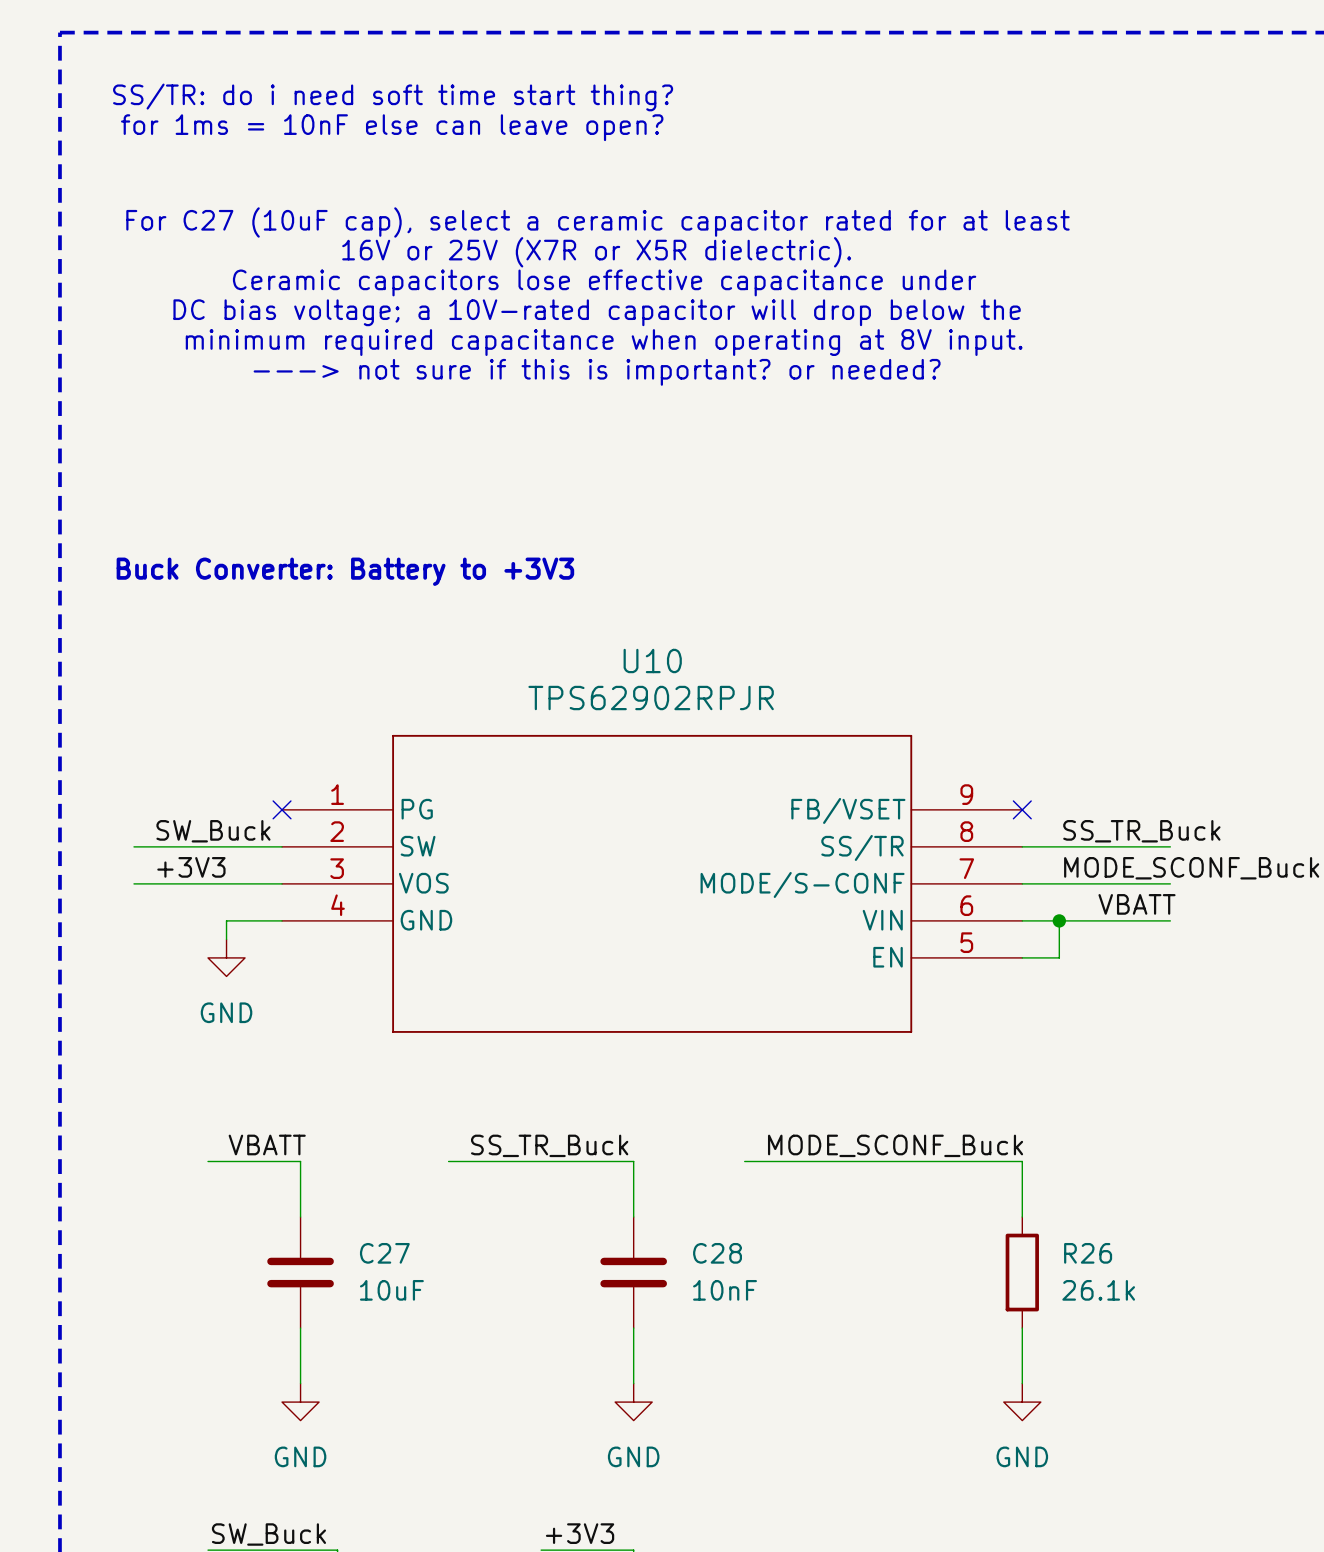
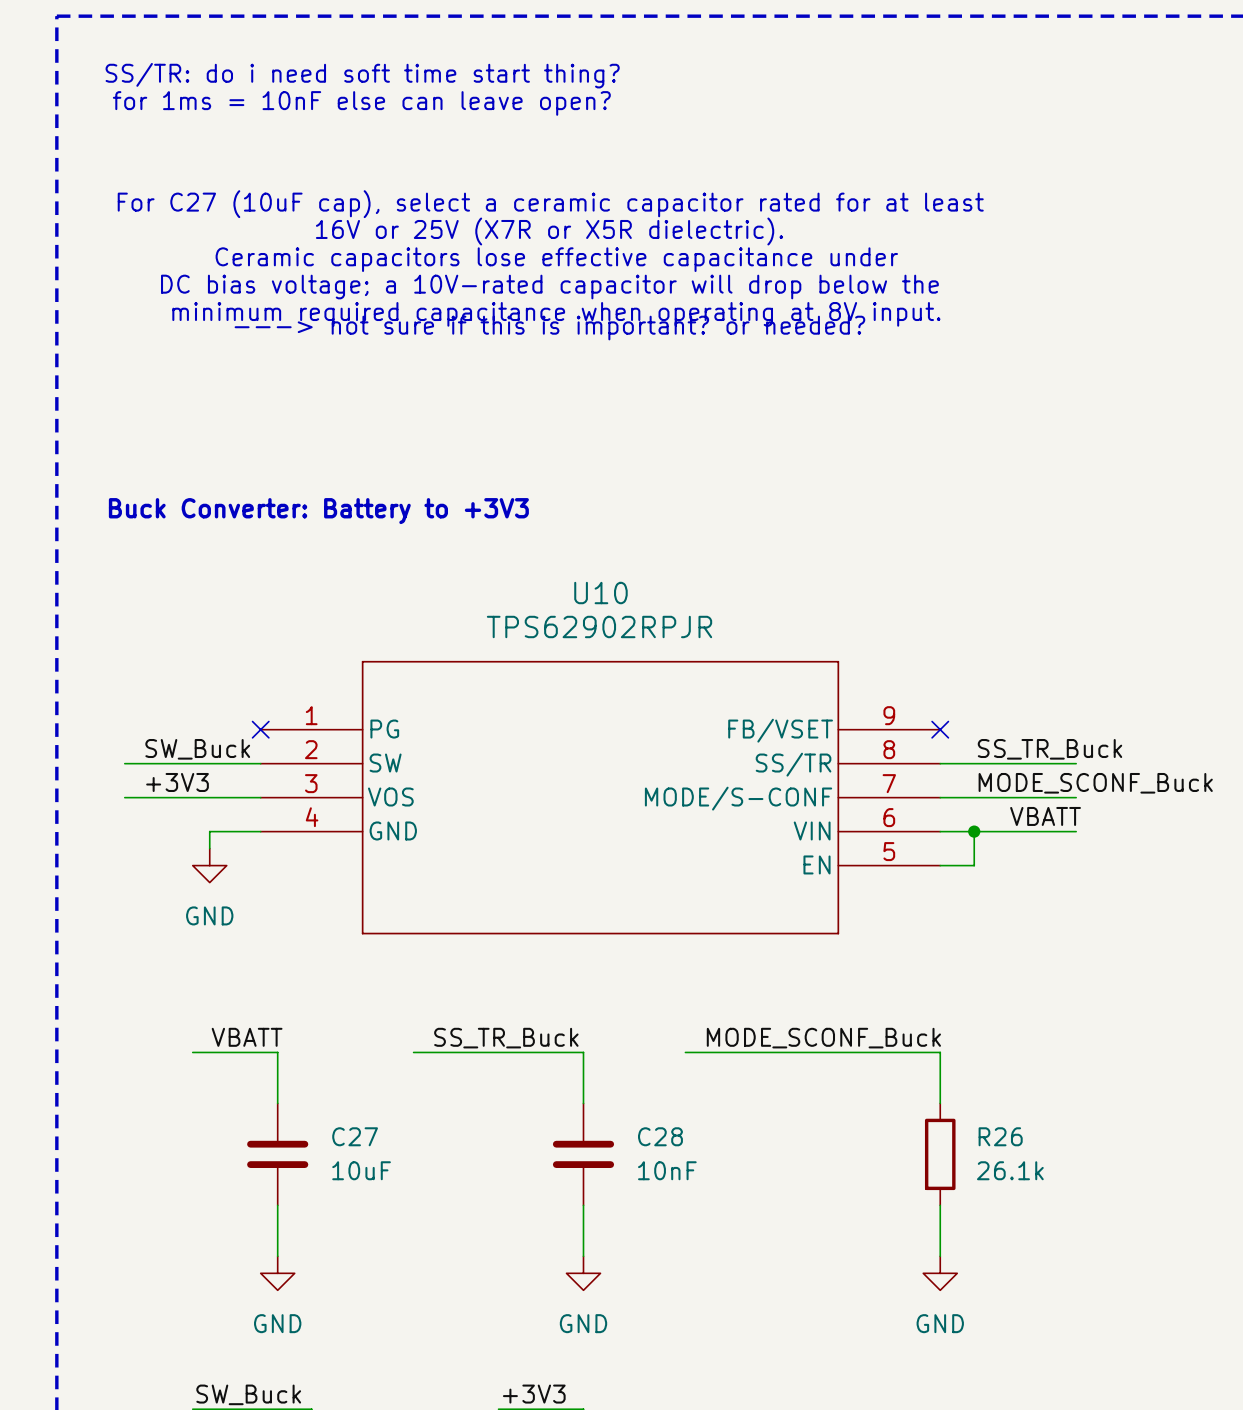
text position: For C27 (10uF cap), select a ceramic capacitor rated for at least (597, 222) -> For C27 (10uF cap), select a ceramic capacitor rated for at least (550, 204)
text position: 16V or 25V (X7R or X5R dielectric). (596, 252) -> 16V or 25V (X7R or X5R dielectric). (549, 231)
text position: Ceramic capacitors lose effective capacitance under (604, 282) -> Ceramic capacitors lose effective capacitance under (556, 259)
text position: DC bias voltage; a 10V-rated capacitor will drop below the (597, 312) -> DC bias voltage; a 10V-rated capacitor will drop below the (549, 287)
text position: minimum required capacitance when operating at 8V input. (604, 342) -> minimum required capacitance when operating at 8V input. (556, 314)

